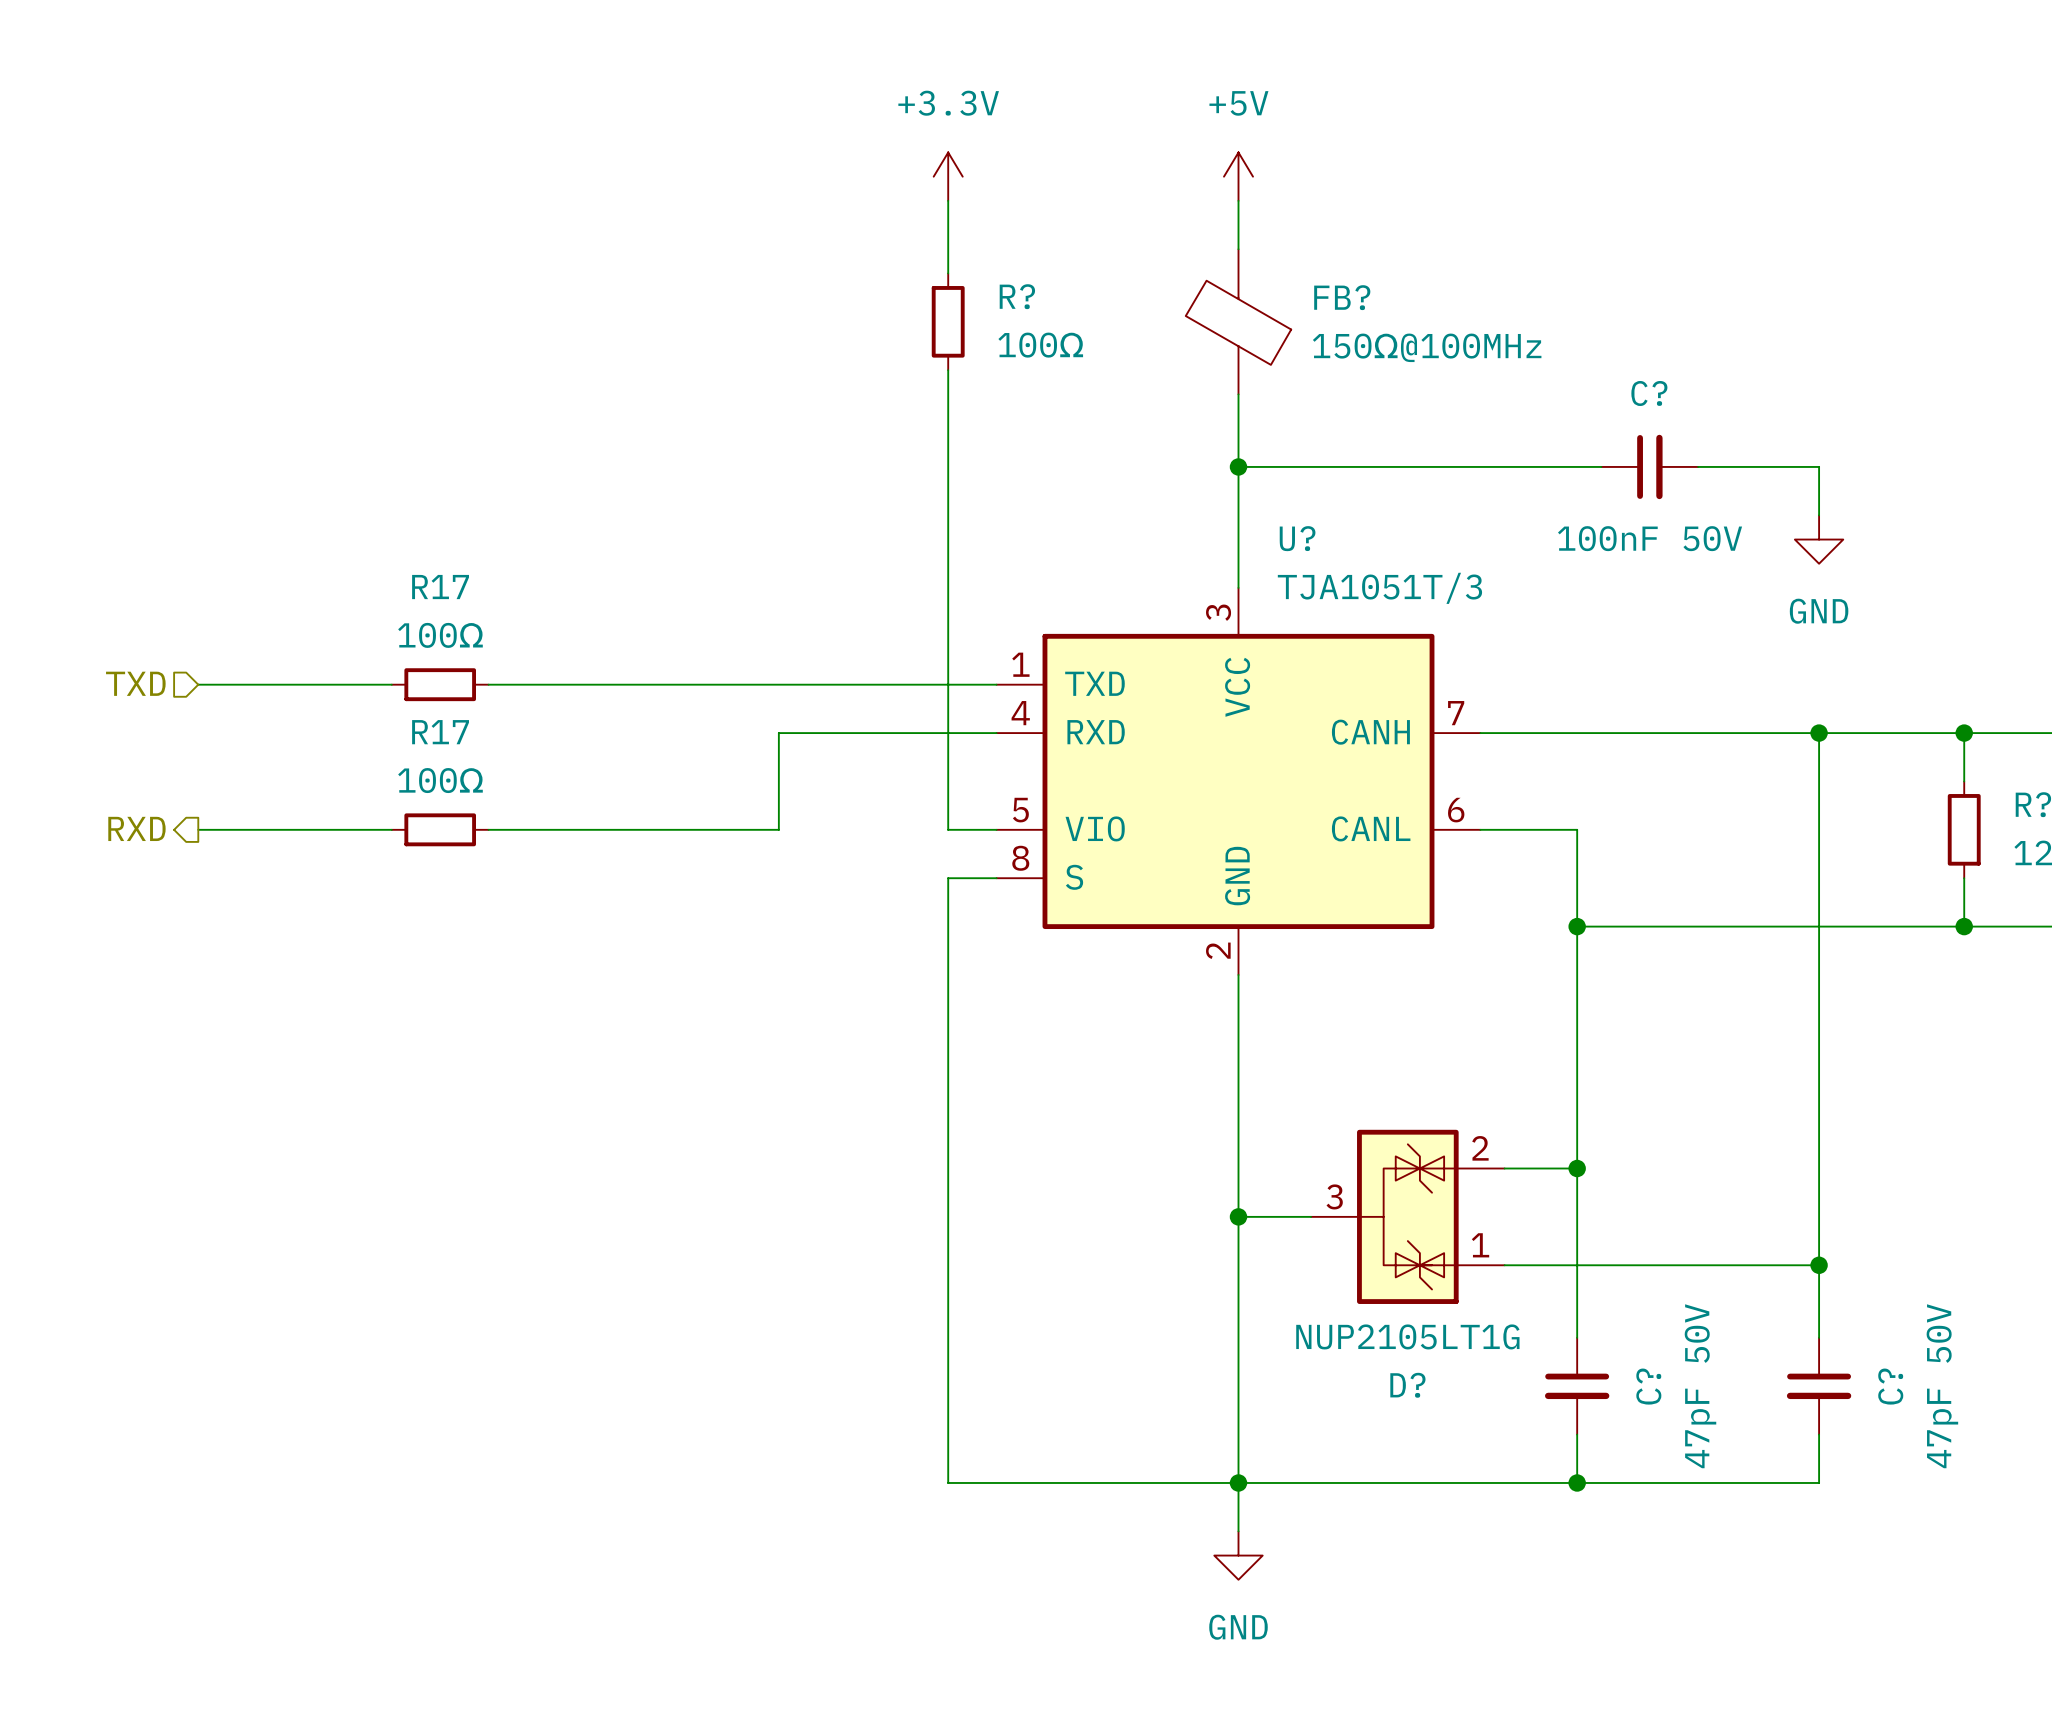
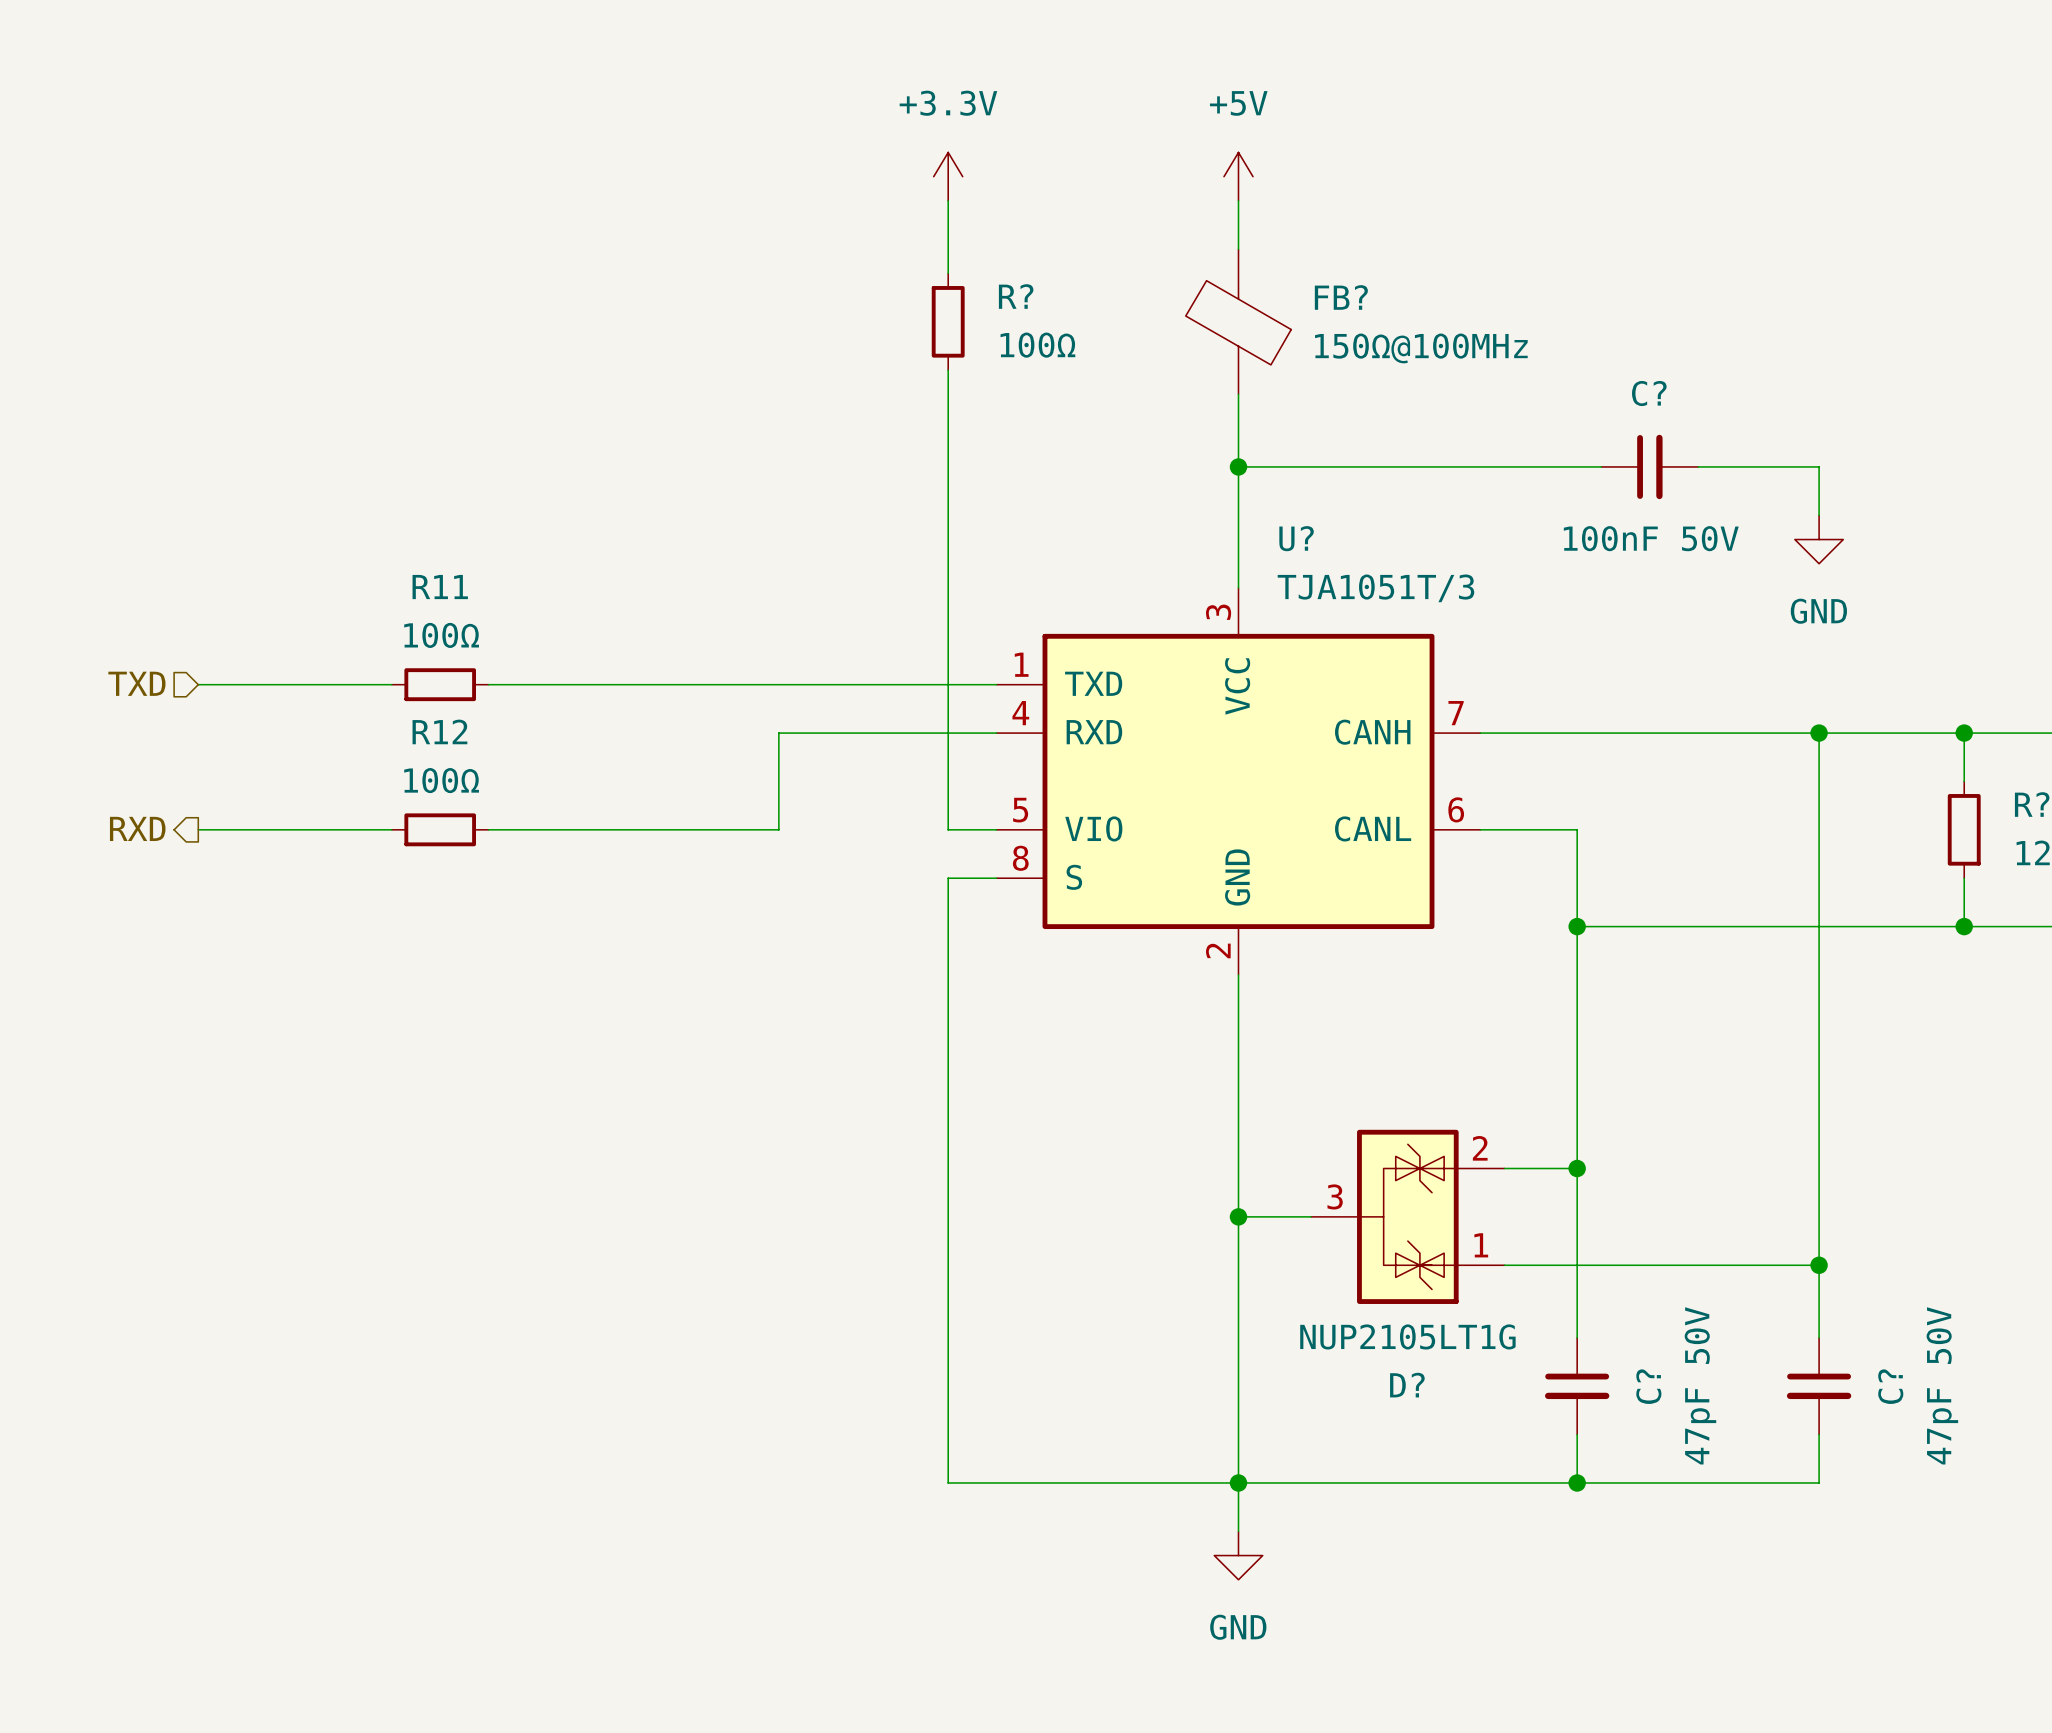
R17 name: R17 (440, 587) -> R11 (440, 587)
R17 name: R17 (440, 732) -> R12 (439, 731)

